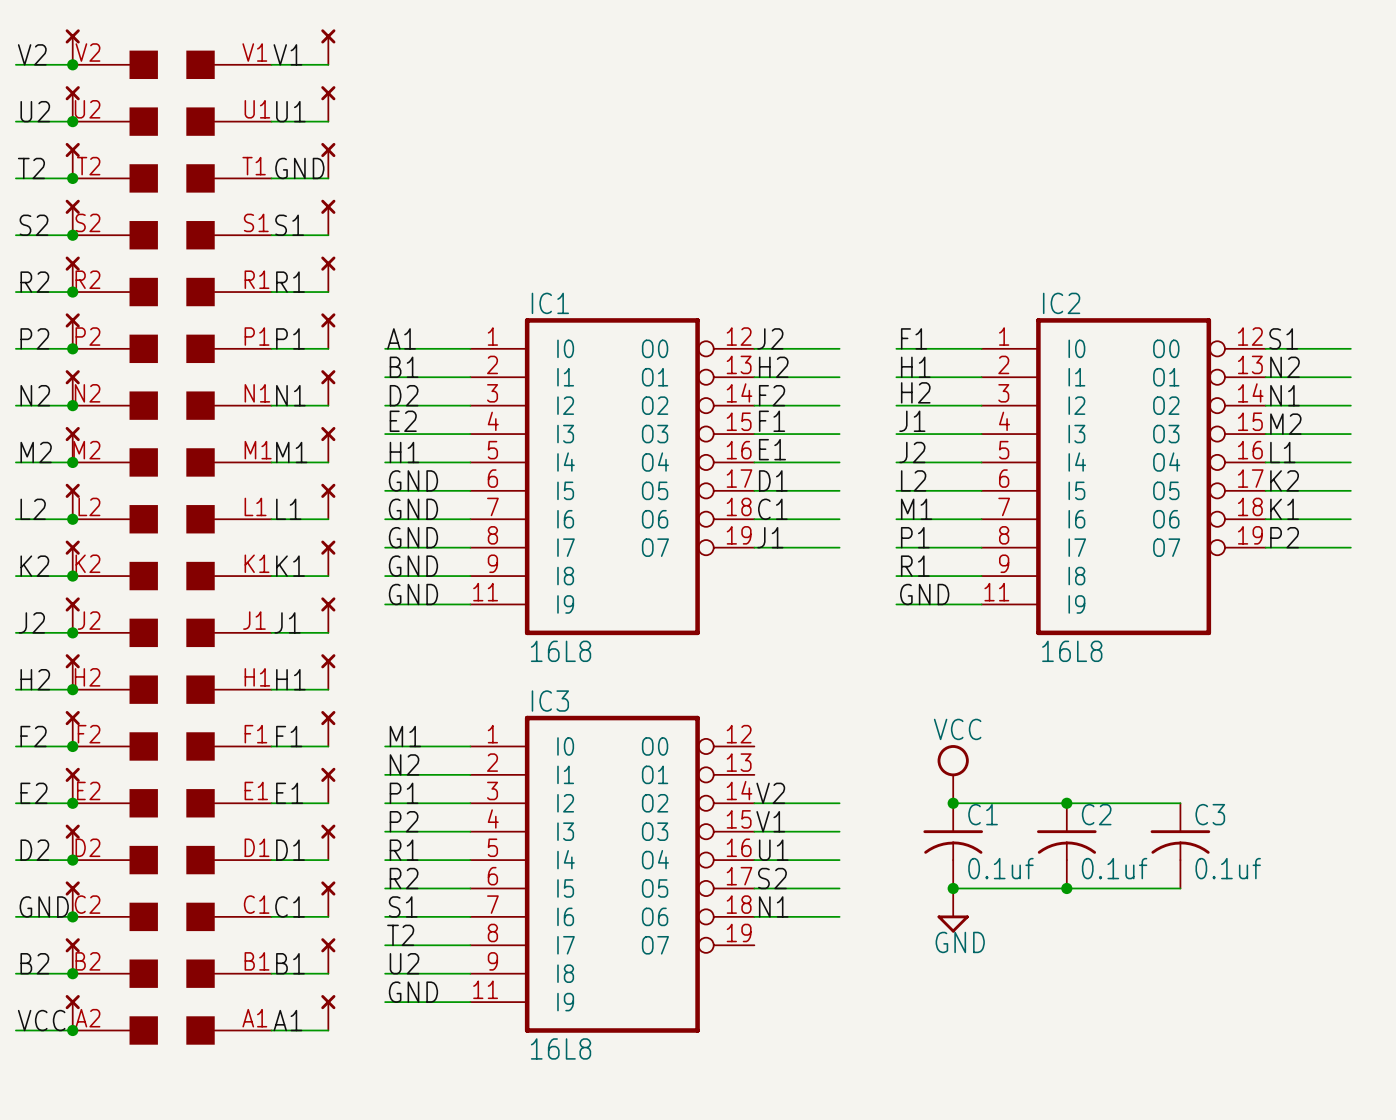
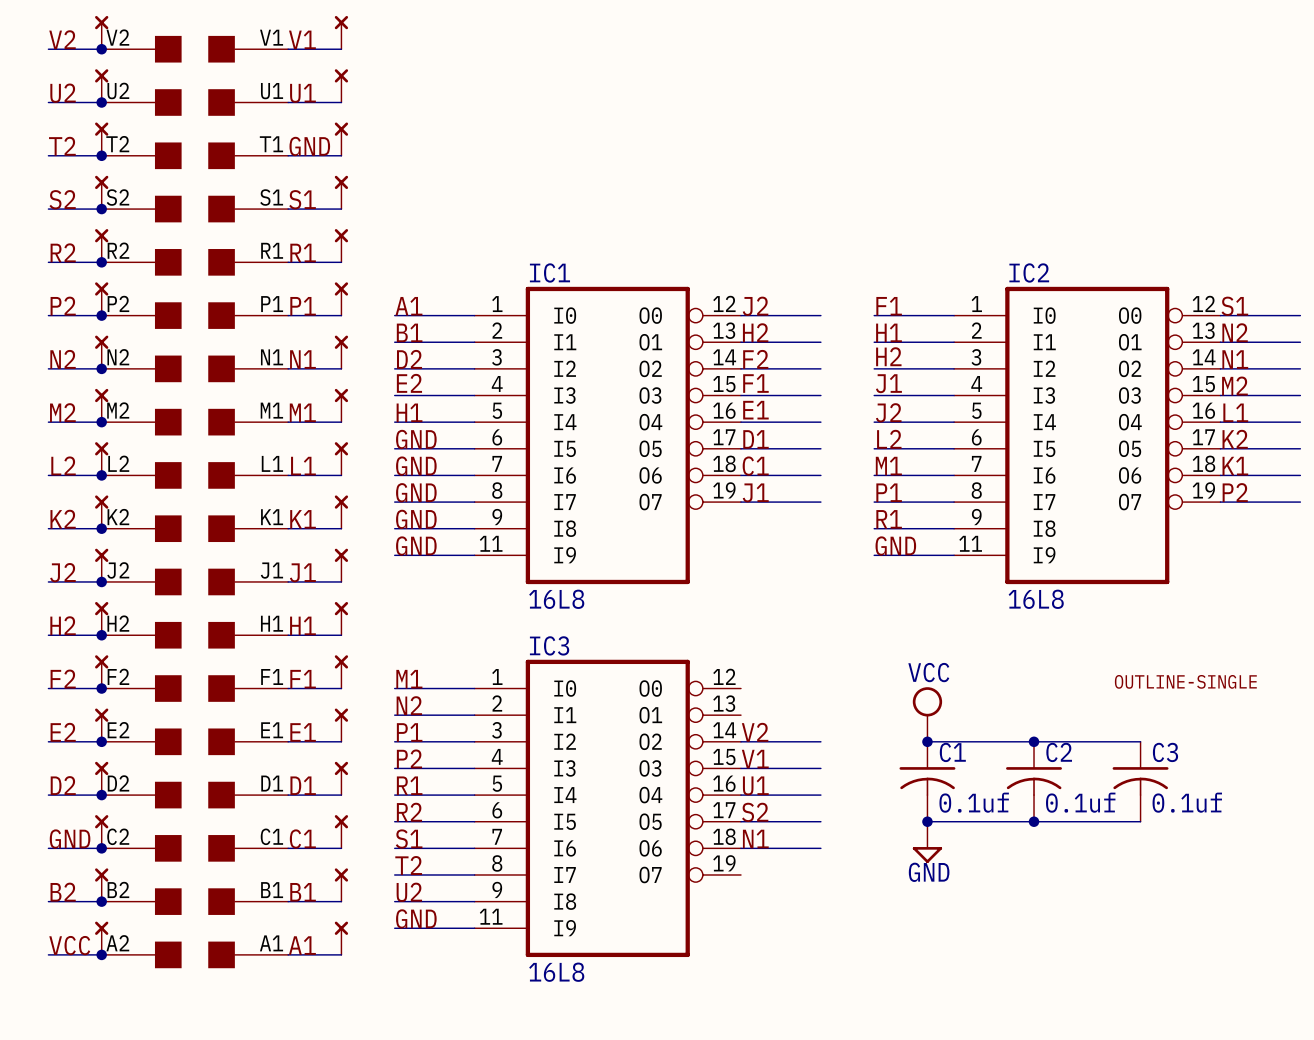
part: none -> OUTLINE-SINGLE (1185, 681)

